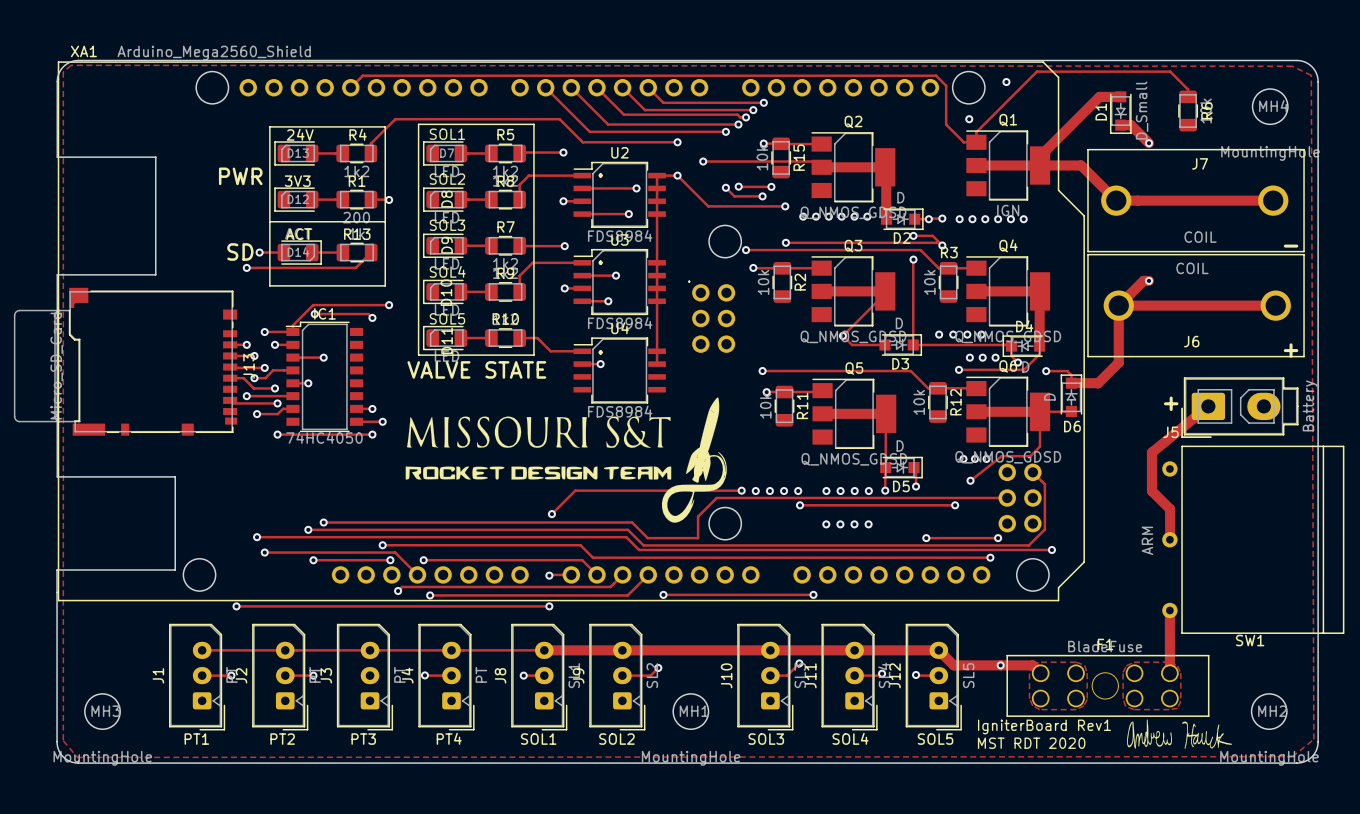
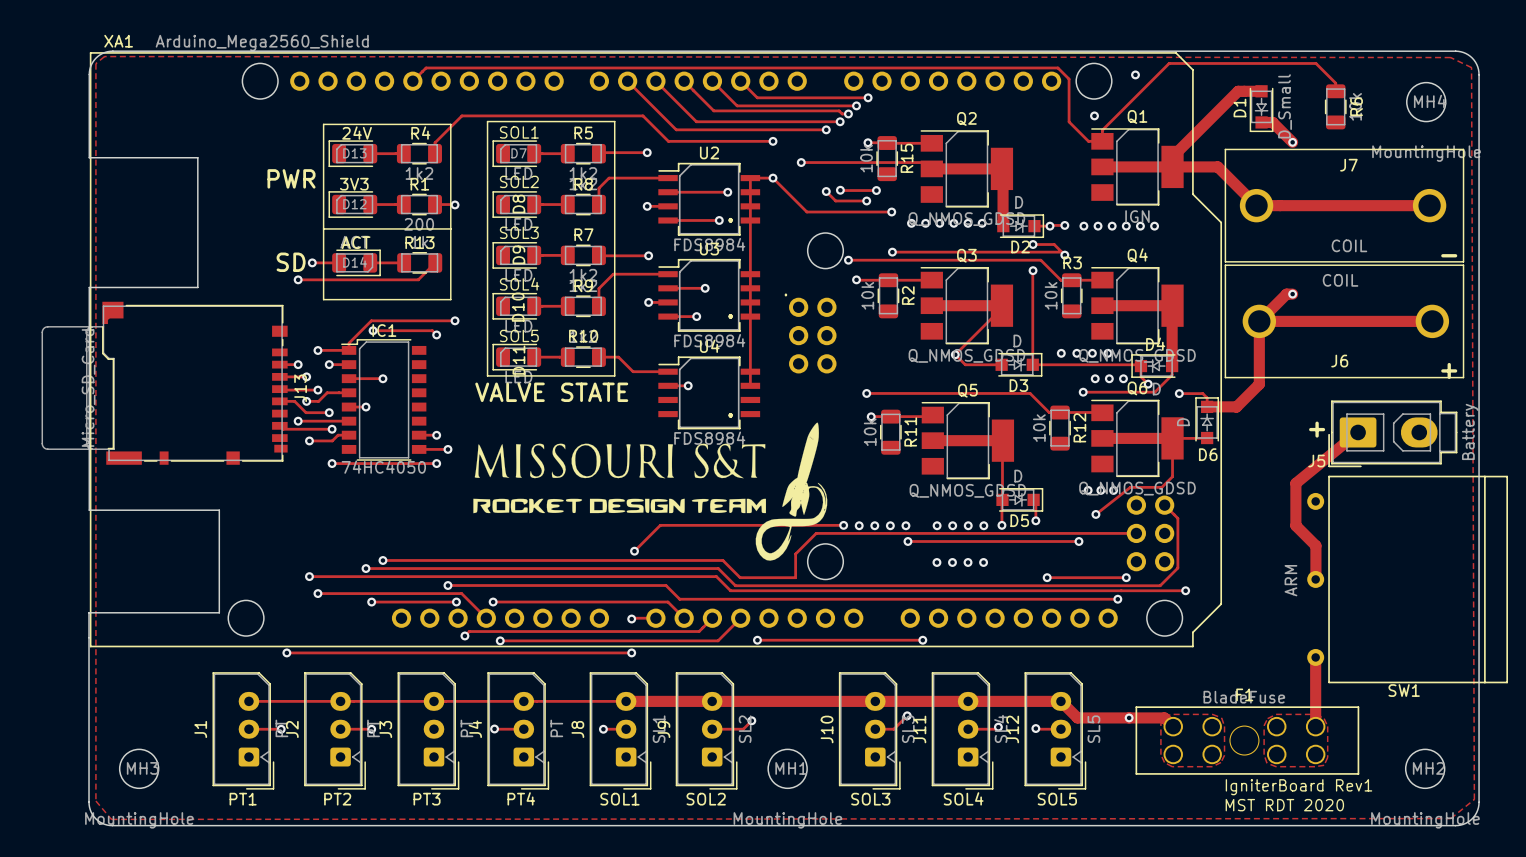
text: . (600, 175) -> none
text: none -> . (730, 220)
text: . (600, 262) -> none
text: none -> . (730, 316)
text: . (600, 352) -> none
text: none -> . (730, 415)
drawing: [1127, 719, 1233, 749] -> none
text position: IgniterBoard Rev1 (1044, 726) -> IgniterBoard Rev1 (1298, 787)
text position: MST RDT 2020 (1031, 743) -> MST RDT 2020 (1284, 805)

